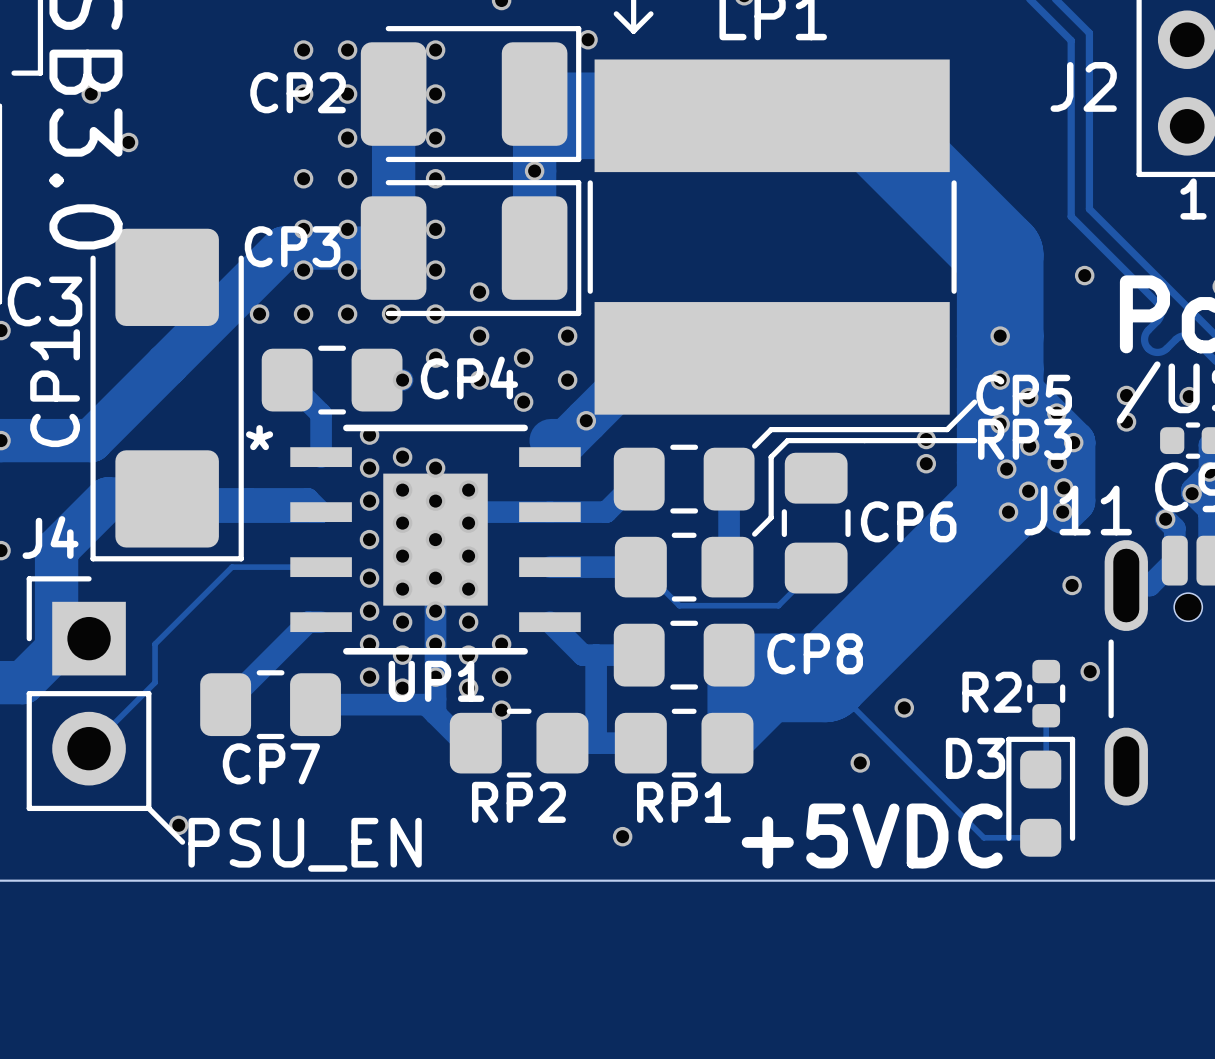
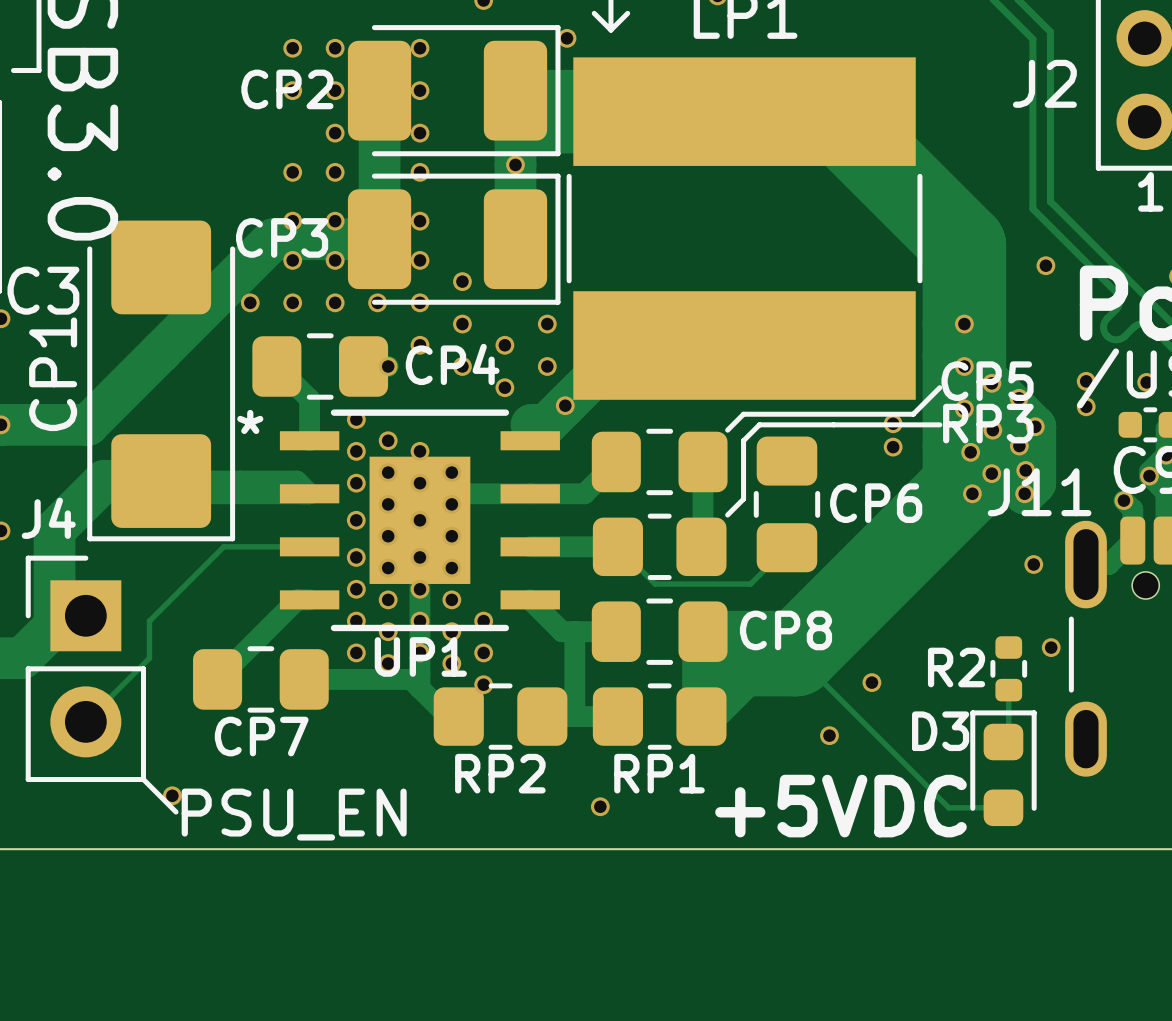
via: (91, 94) -> none
via: (128, 142) -> none

